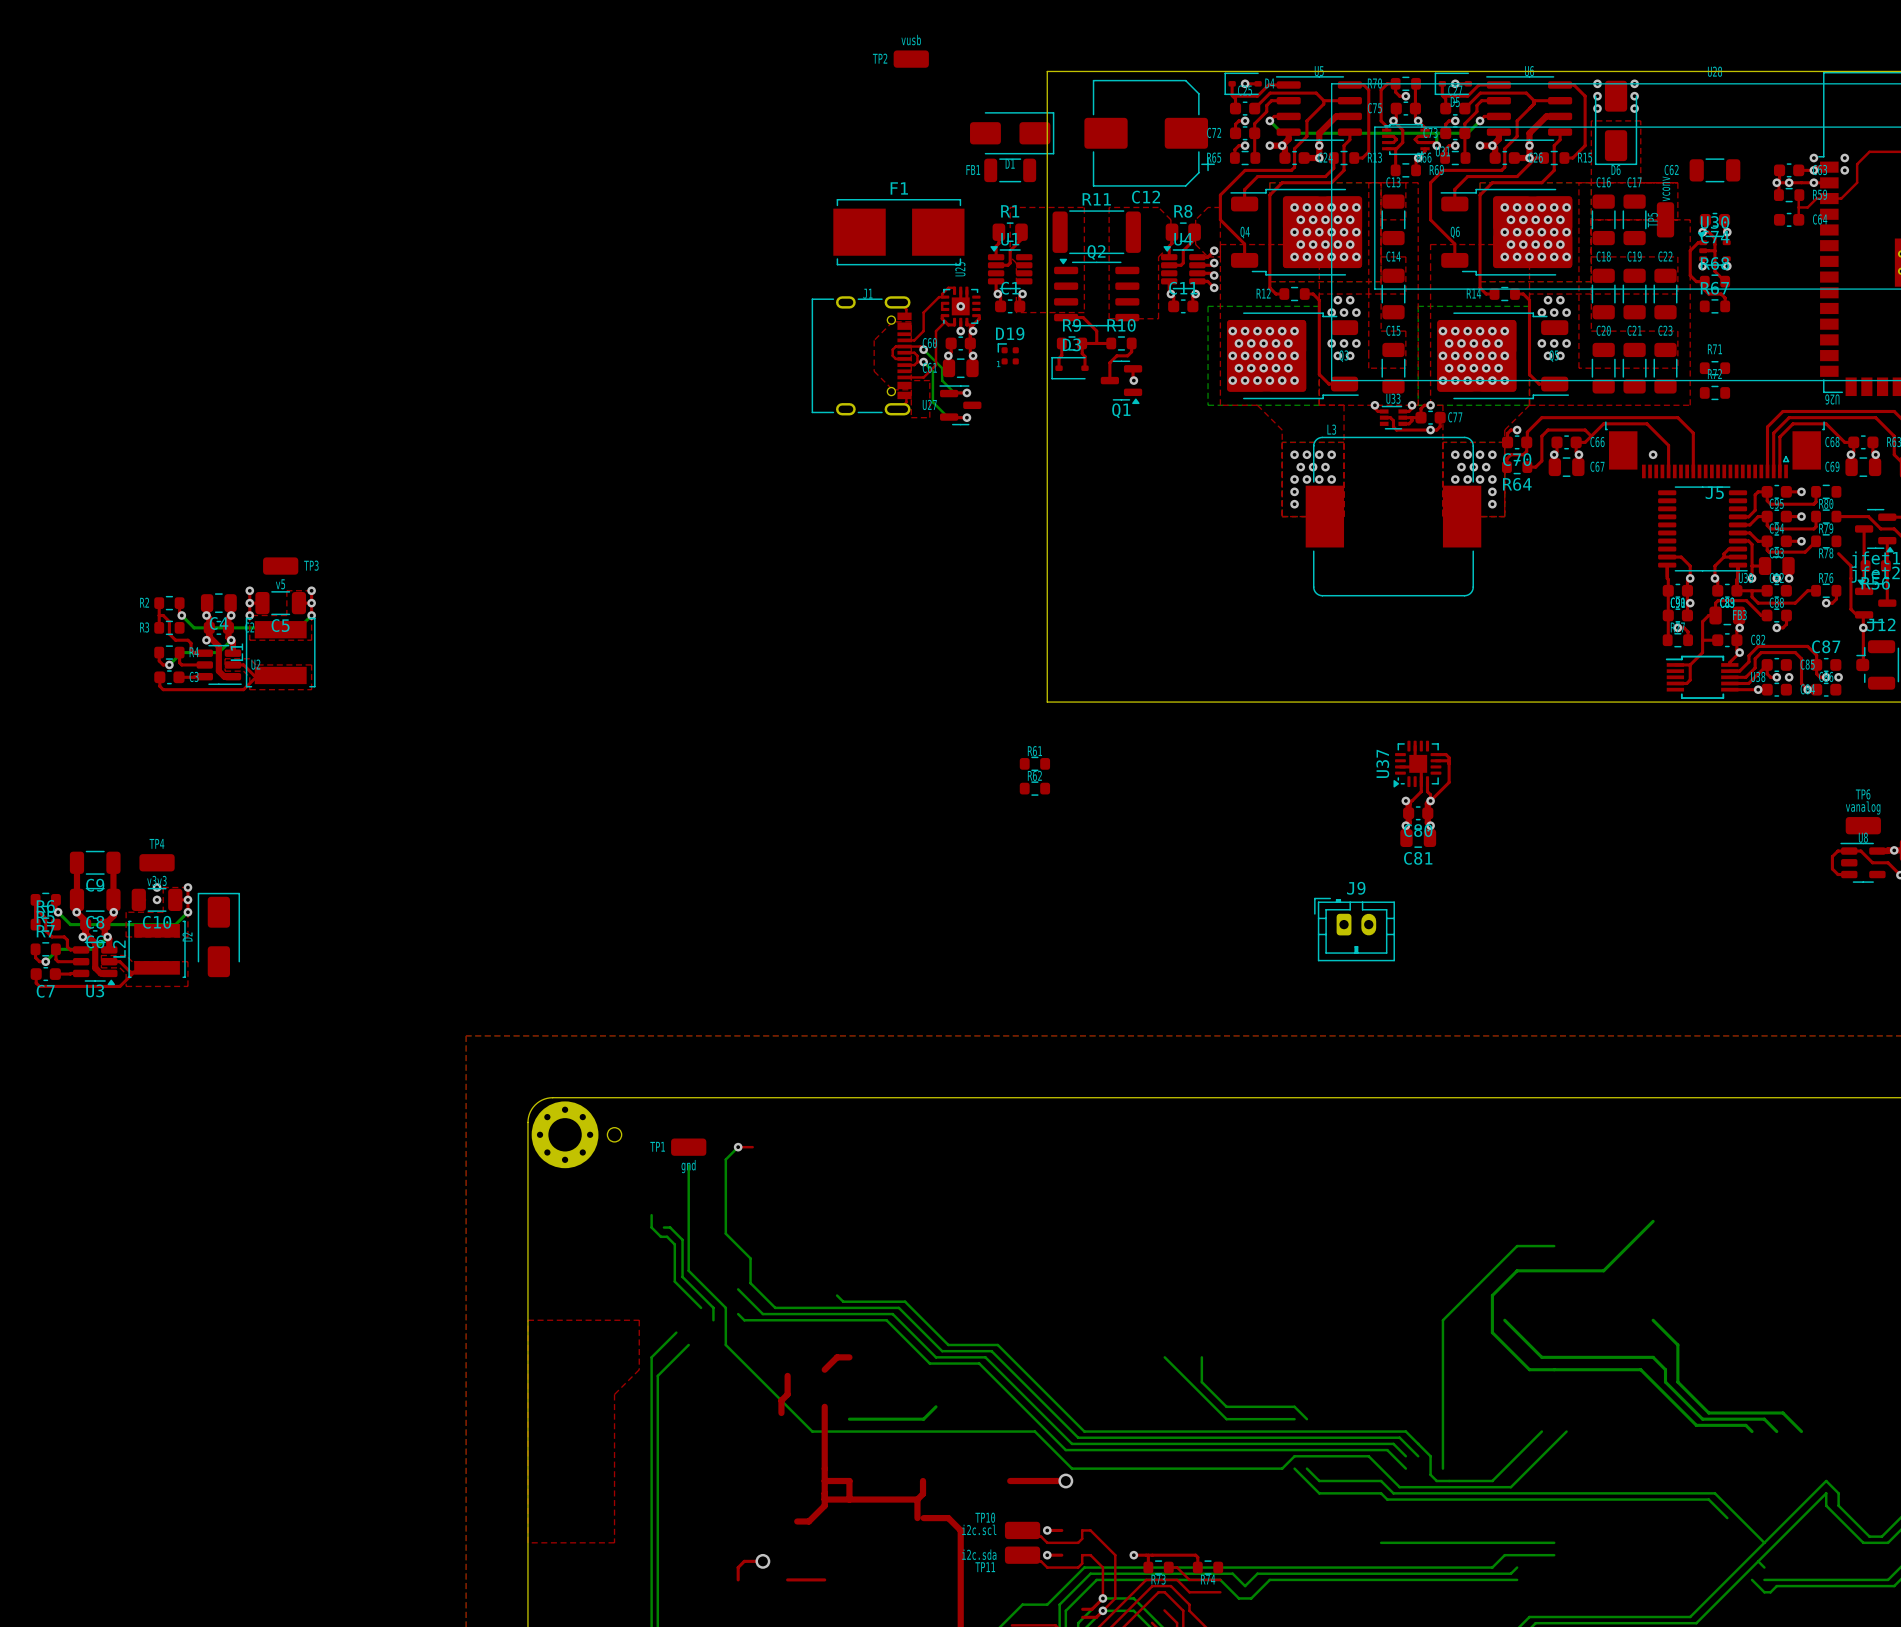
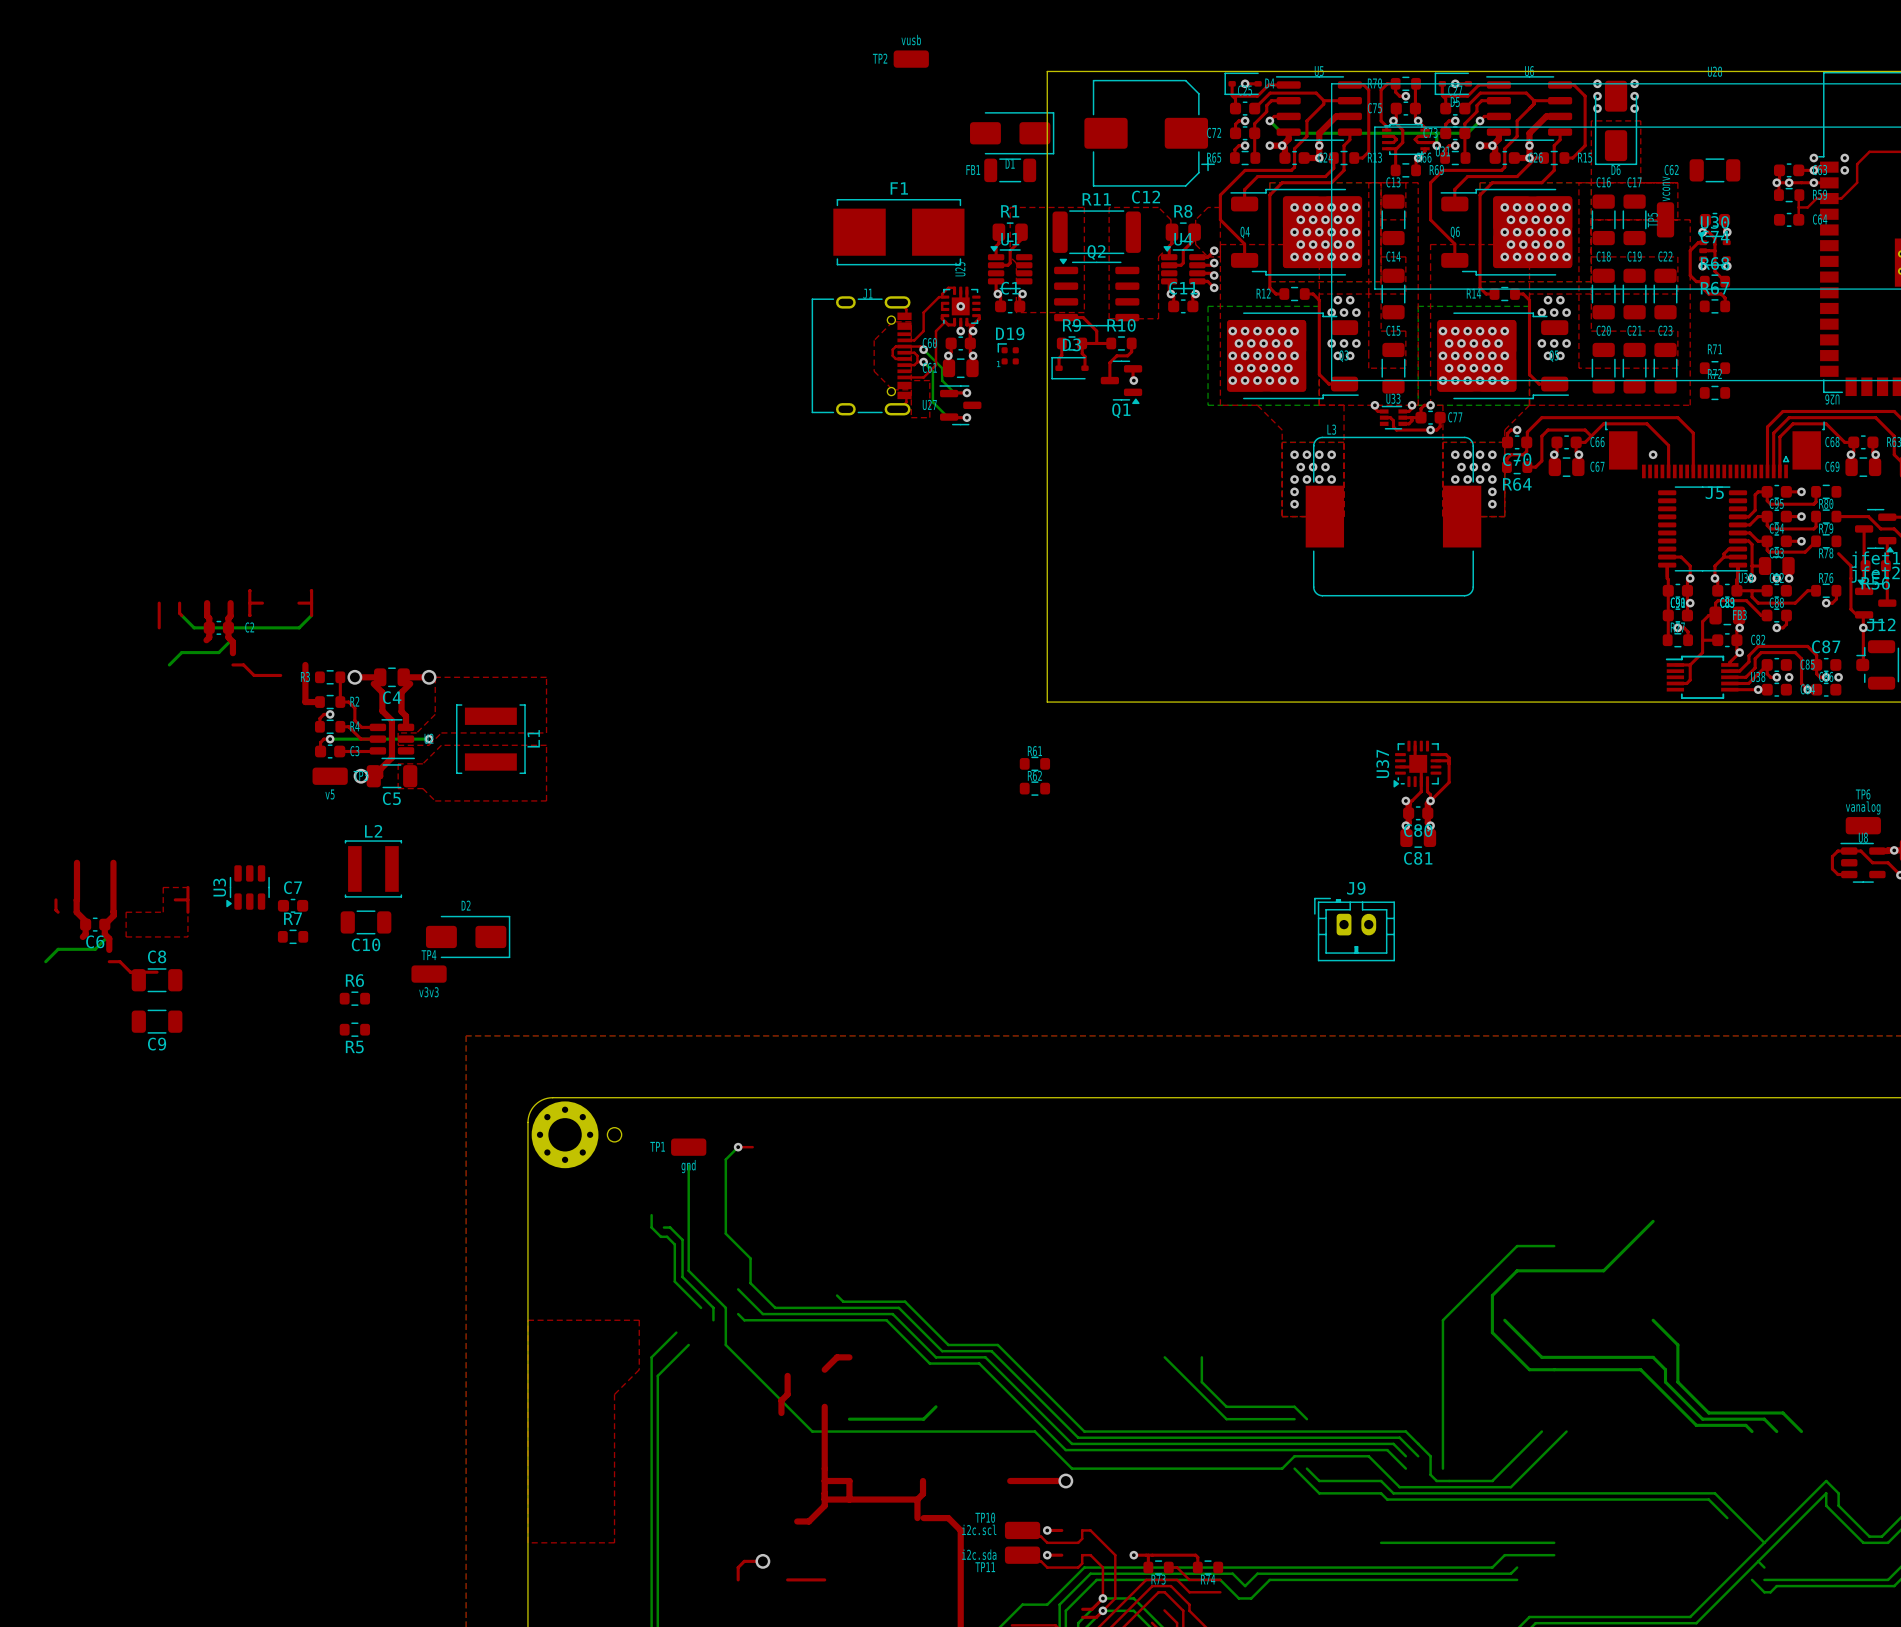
TP3 position: (280, 566) -> (330, 776)
via: (249, 590) -> none
top zone outline: (286, 590) (311, 590) (311, 640) (249, 640) (249, 615) (286, 615) (286, 590) -> none
via: (311, 590) -> none
R2 name position: R2 (144, 602) -> R2 (354, 701)
R2 position: (169, 603) -> (330, 702)
C4 position: (218, 603) -> (391, 677)
via: (249, 603) -> none
C5 position: (280, 603) -> (391, 776)
via: (311, 603) -> none
top track: (159, 615) (163, 615) (169, 621) (169, 634) (175, 640) (187, 640) (194, 653) (204, 653) -> none
via: (181, 615) -> none
via: (206, 615) -> none
via: (231, 615) -> none
via: (249, 615) -> none
via: (311, 615) -> none
R3 position: (169, 627) -> (330, 677)
top track: (209, 636) (218, 646) (218, 671) (224, 676) (232, 676) -> none
via: (206, 640) -> none
via: (231, 640) -> none
top track: (159, 652) (159, 660) (163, 664) (169, 664) -> none
R4 position: (169, 652) -> (330, 726)
top track: (179, 652) (179, 662) (181, 664) (204, 664) -> none
L1 name position: L1 (236, 652) -> L1 (533, 738)
L1 position: (280, 652) -> (490, 739)
top zone outline: (225, 658) (249, 658) (255, 664) (311, 664) (311, 689) (249, 689) (249, 677) (243, 671) (225, 671) (225, 658) -> none
via: (169, 664) -> none
U2 position: (219, 664) -> (392, 739)
top track: none -> (305, 664) (305, 702) (319, 702)
top track: (257, 675) (243, 689) (163, 689) (159, 686) (159, 677) -> none
top track: (204, 676) (178, 677) -> none
C3 position: (169, 677) -> (330, 751)
top track: none -> (340, 677) (340, 702) (348, 702) (354, 708) (354, 720) (361, 727) (377, 727)
top track: none -> (354, 677) (373, 677)
via: none -> (354, 677)
top track: none -> (410, 677) (429, 677)
via: none -> (429, 677)
top zone outline: none -> (435, 677) (546, 677) (546, 732) (441, 732) (429, 745) (398, 745) (398, 732) (416, 732) (435, 714) (435, 677)
top track: none -> (373, 683) (382, 692) (382, 711) (391, 720) (391, 757) (380, 769) (380, 776) (361, 776)
top track: none -> (410, 683) (401, 692) (401, 711) (406, 716) (406, 727)
top track: none -> (330, 714) (323, 714) (319, 718) (319, 726)
via: none -> (330, 714)
top track: none -> (340, 726) (348, 726) (361, 739) (377, 739)
top track: none -> (330, 739) (323, 739) (320, 742) (320, 751)
bottom track: none -> (330, 739) (429, 739)
via: none -> (330, 739)
via: none -> (429, 739)
top zone outline: none -> (441, 745) (546, 745) (546, 800) (435, 800) (422, 788) (398, 788) (398, 763) (422, 763) (441, 745)
top track: none -> (339, 751) (377, 751)
via: none -> (361, 776)
C9 position: (95, 862) -> (157, 1021)
TP4 position: (157, 862) -> (429, 974)
via: (157, 887) -> none
via: (187, 887) -> none
top track: (35, 899) (35, 924) -> none
R5 position: (45, 899) -> (354, 1029)
C8 position: (95, 899) -> (157, 980)
C10 position: (157, 899) -> (366, 922)
via: (157, 899) -> none
via: (187, 899) -> none
top track: (35, 912) (39, 912) (45, 918) (45, 930) (51, 936) (64, 936) (70, 949) (81, 949) -> none
bottom track: (58, 912) (70, 924) (175, 924) (187, 912) -> none
via: (58, 912) -> none
via: (76, 912) -> none
via: (113, 912) -> none
via: (187, 912) -> none
C8 name position: C8 (95, 922) -> C8 (157, 956)
R6 position: (45, 924) -> (354, 998)
top track: (85, 933) (95, 943) (95, 967) (100, 973) (109, 973) -> none
D2 rotation: 0° (218, 934) -> 90° clockwise (468, 936)
D2 position: (218, 934) -> (468, 936)
via: (82, 936) -> none
via: (107, 936) -> none
top track: (35, 949) (35, 957) (39, 961) (45, 961) -> none
R7 position: (45, 949) -> (293, 936)
top track: (55, 949) (55, 959) (58, 961) (81, 961) -> none
L2 rotation: 0° (157, 949) -> 90° clockwise (373, 868)
L2 position: (157, 949) -> (373, 868)
top zone outline: (101, 955) (126, 955) (132, 961) (187, 961) (187, 986) (126, 986) (126, 974) (119, 967) (101, 967) (101, 955) -> none
via: (45, 961) -> none
U3 rotation: 0° (95, 963) -> 90° clockwise (248, 887)
U3 position: (95, 963) -> (248, 887)
top track: (134, 972) (119, 986) (39, 986) (36, 983) (36, 974) -> none
top track: (81, 973) (55, 974) -> none
C7 position: (45, 974) -> (293, 905)
C7 name position: C7 (45, 991) -> C7 (292, 887)

